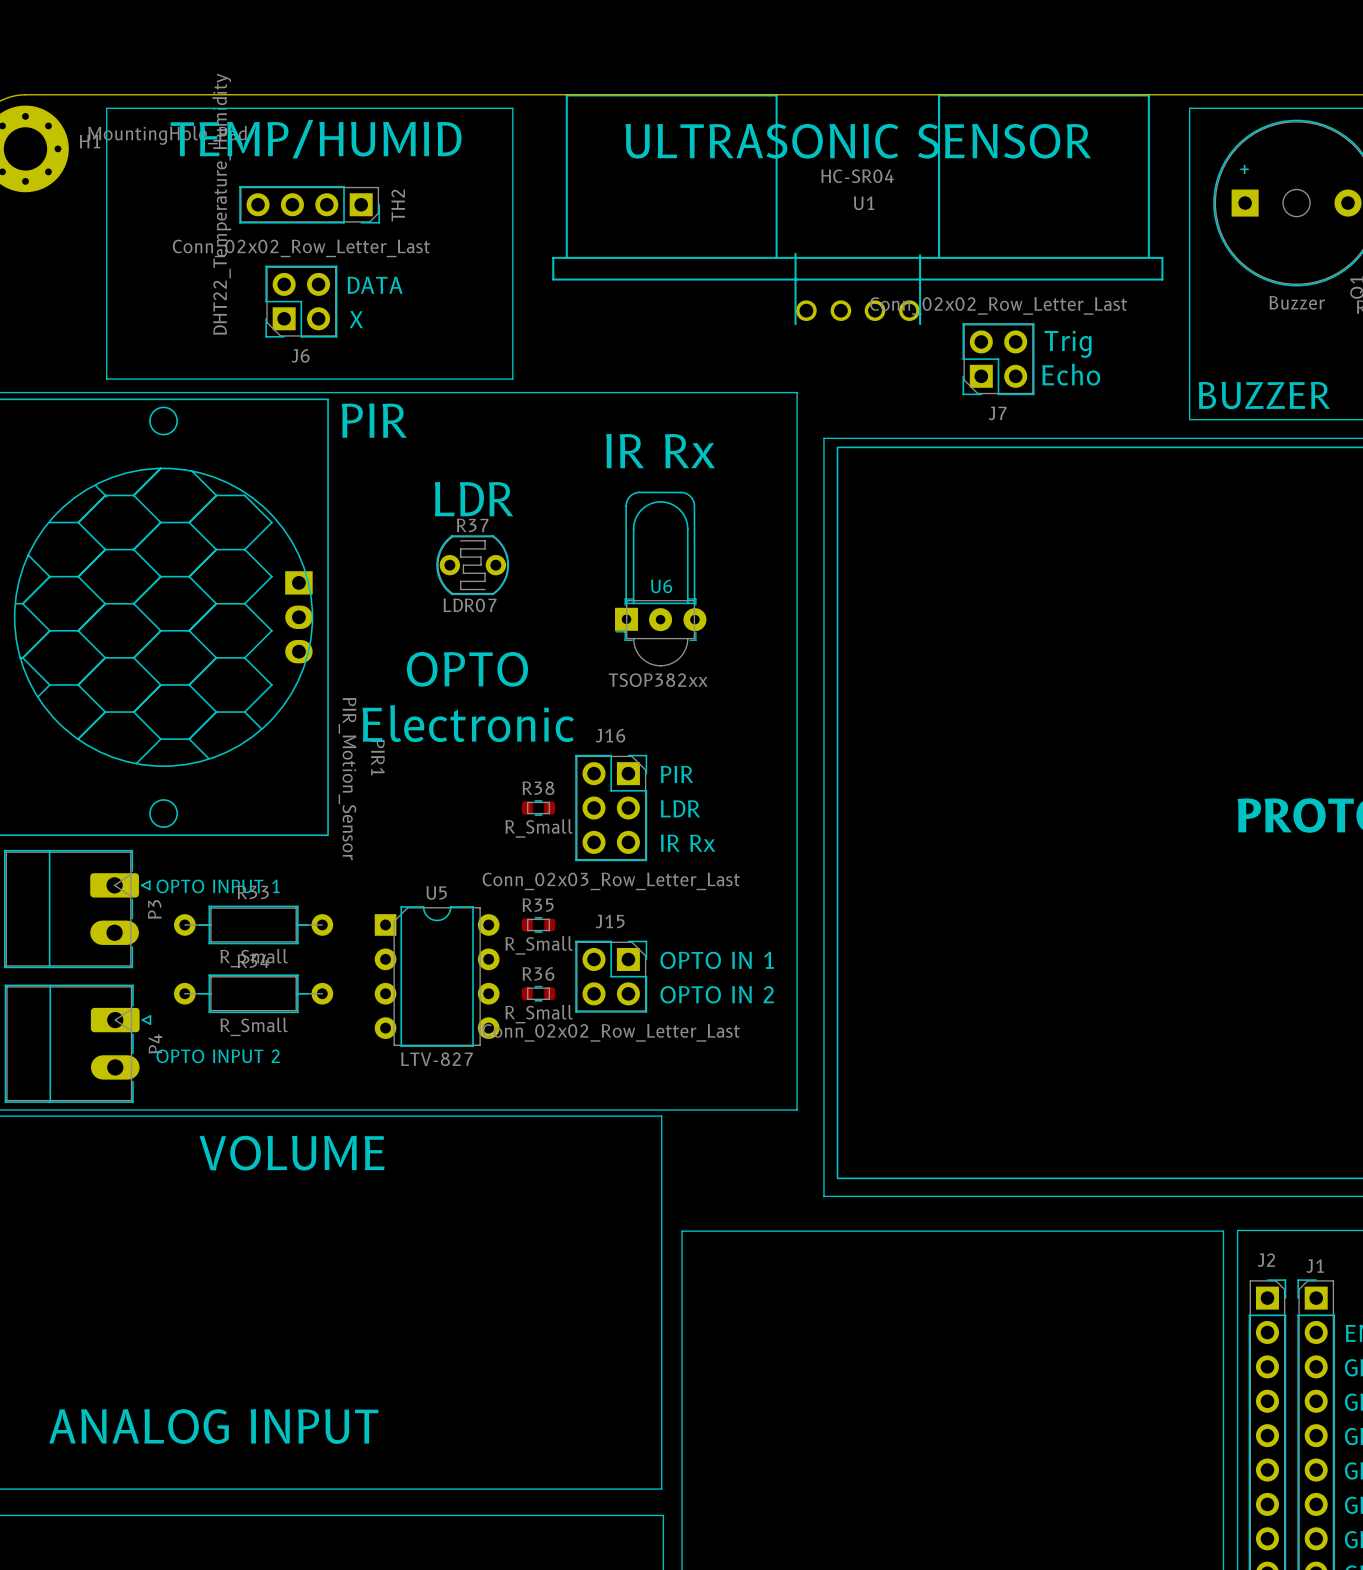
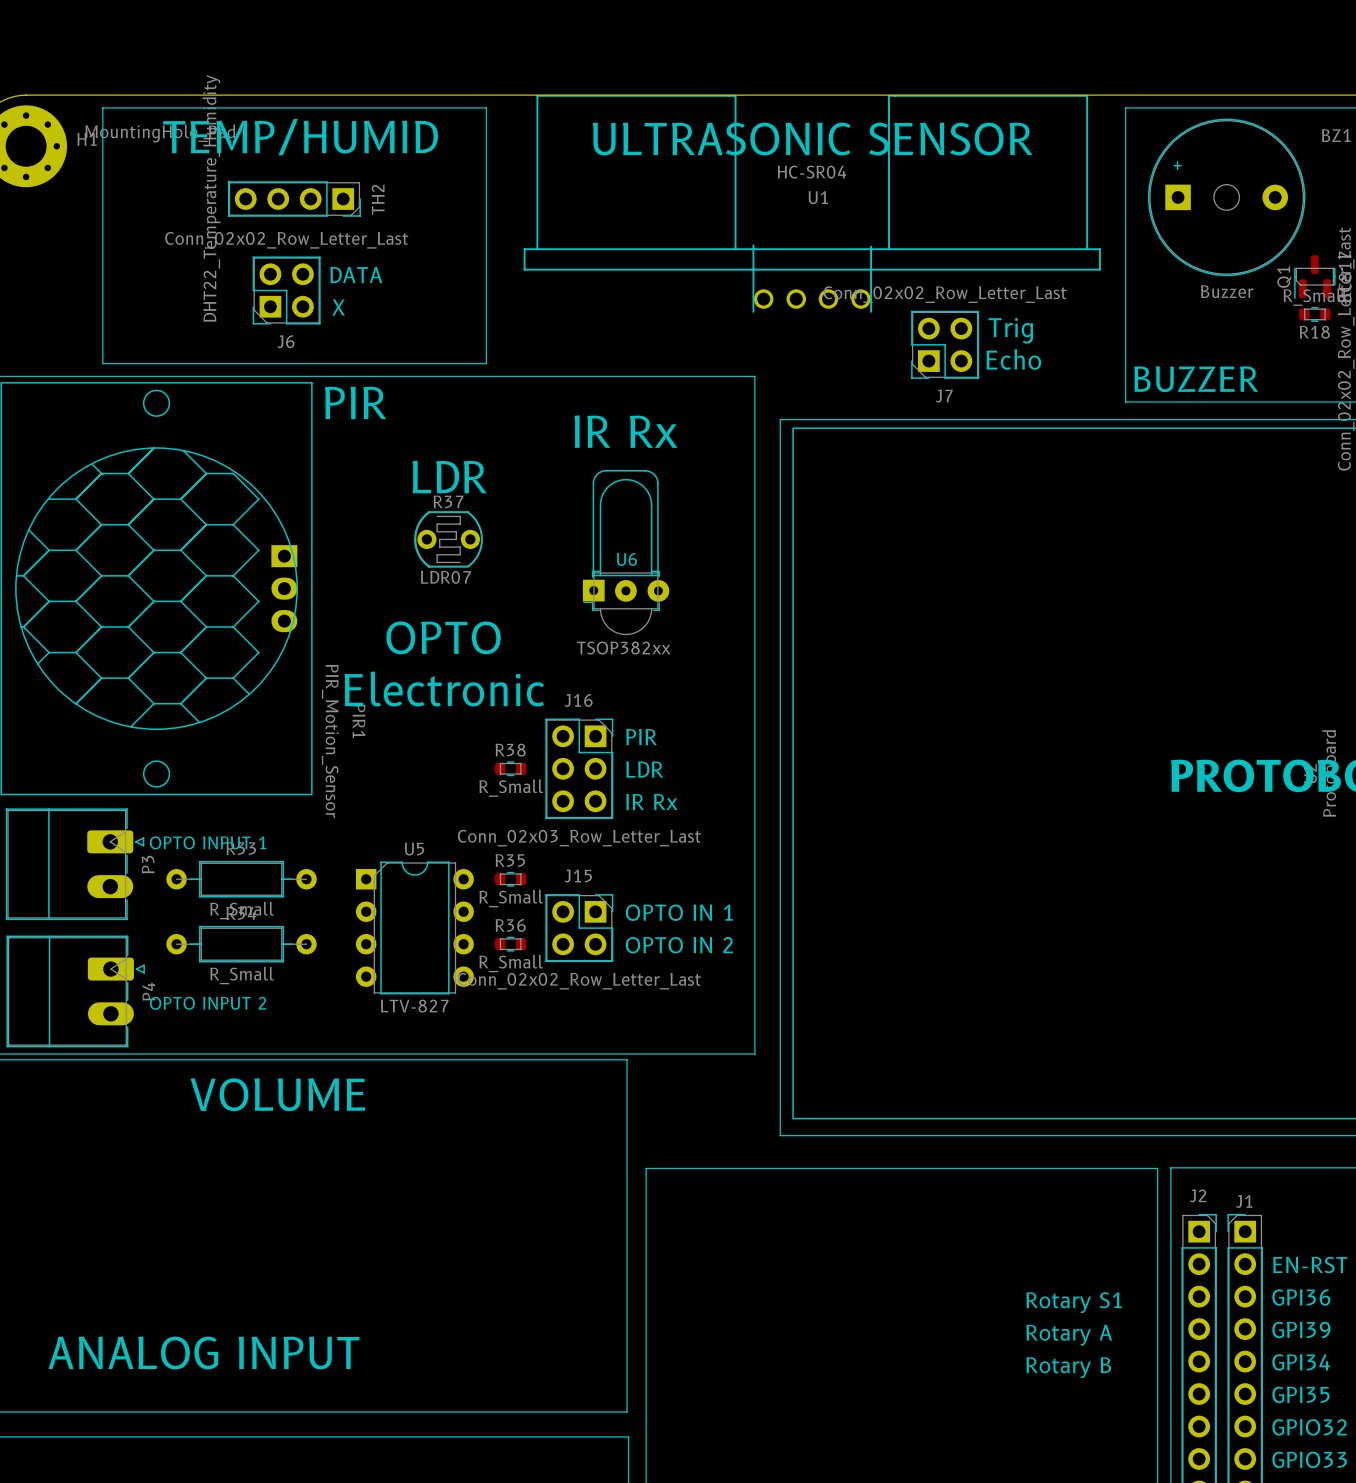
text: none -> Rotary S1 (1074, 1302)
text: none -> Rotary A (1069, 1335)
text: none -> Rotary B (1068, 1367)

